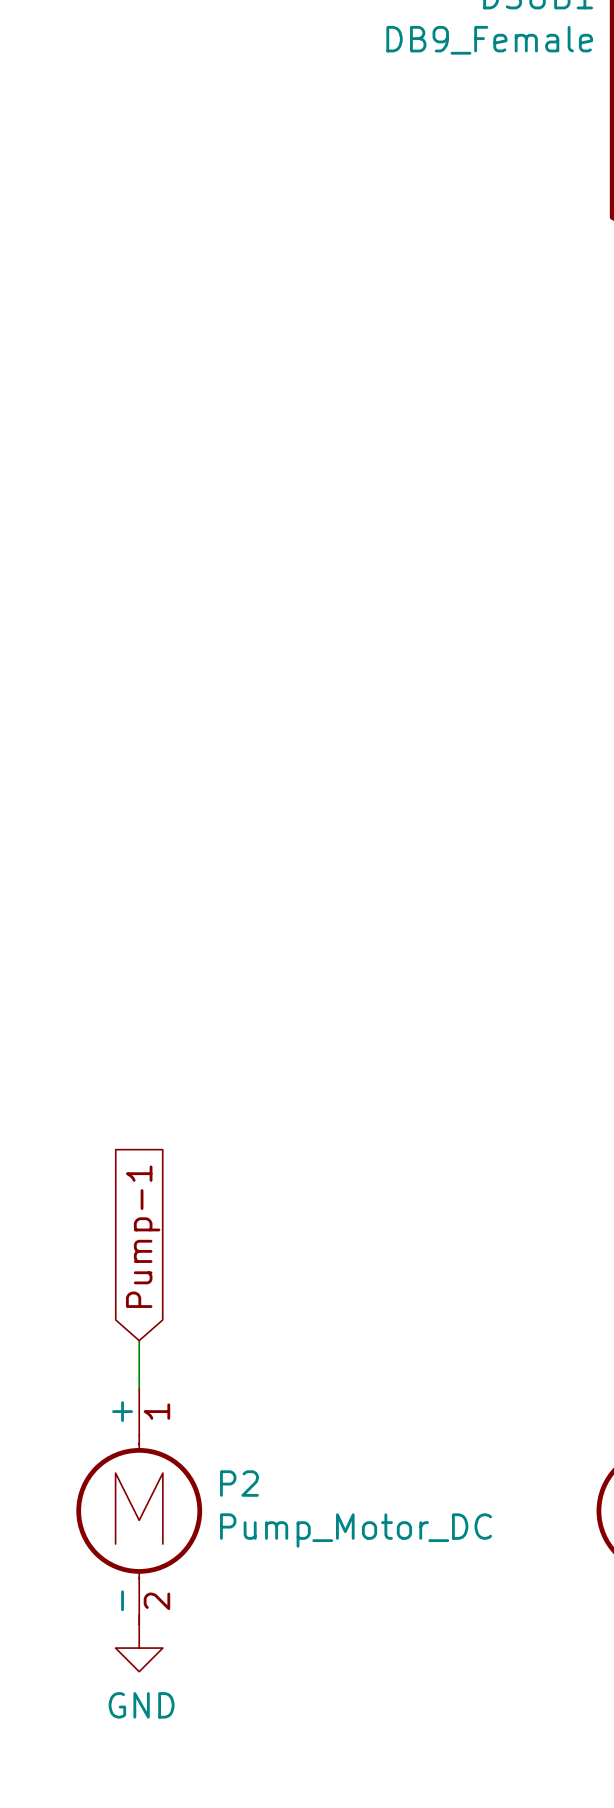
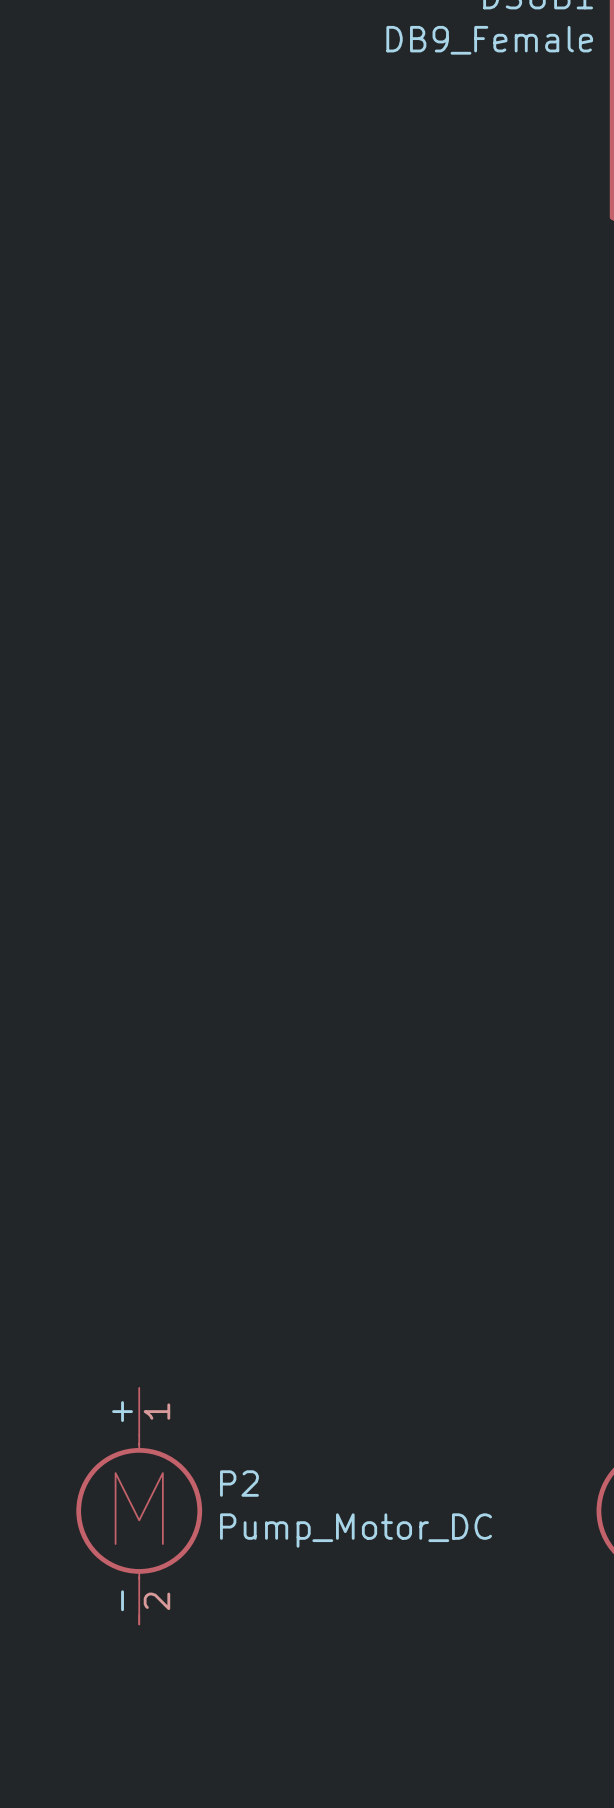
global label: Pump-1 (143, 1236) -> none
wire: (139, 1340) (139, 1387) -> none
power symbol: GND (139, 1648) -> none

